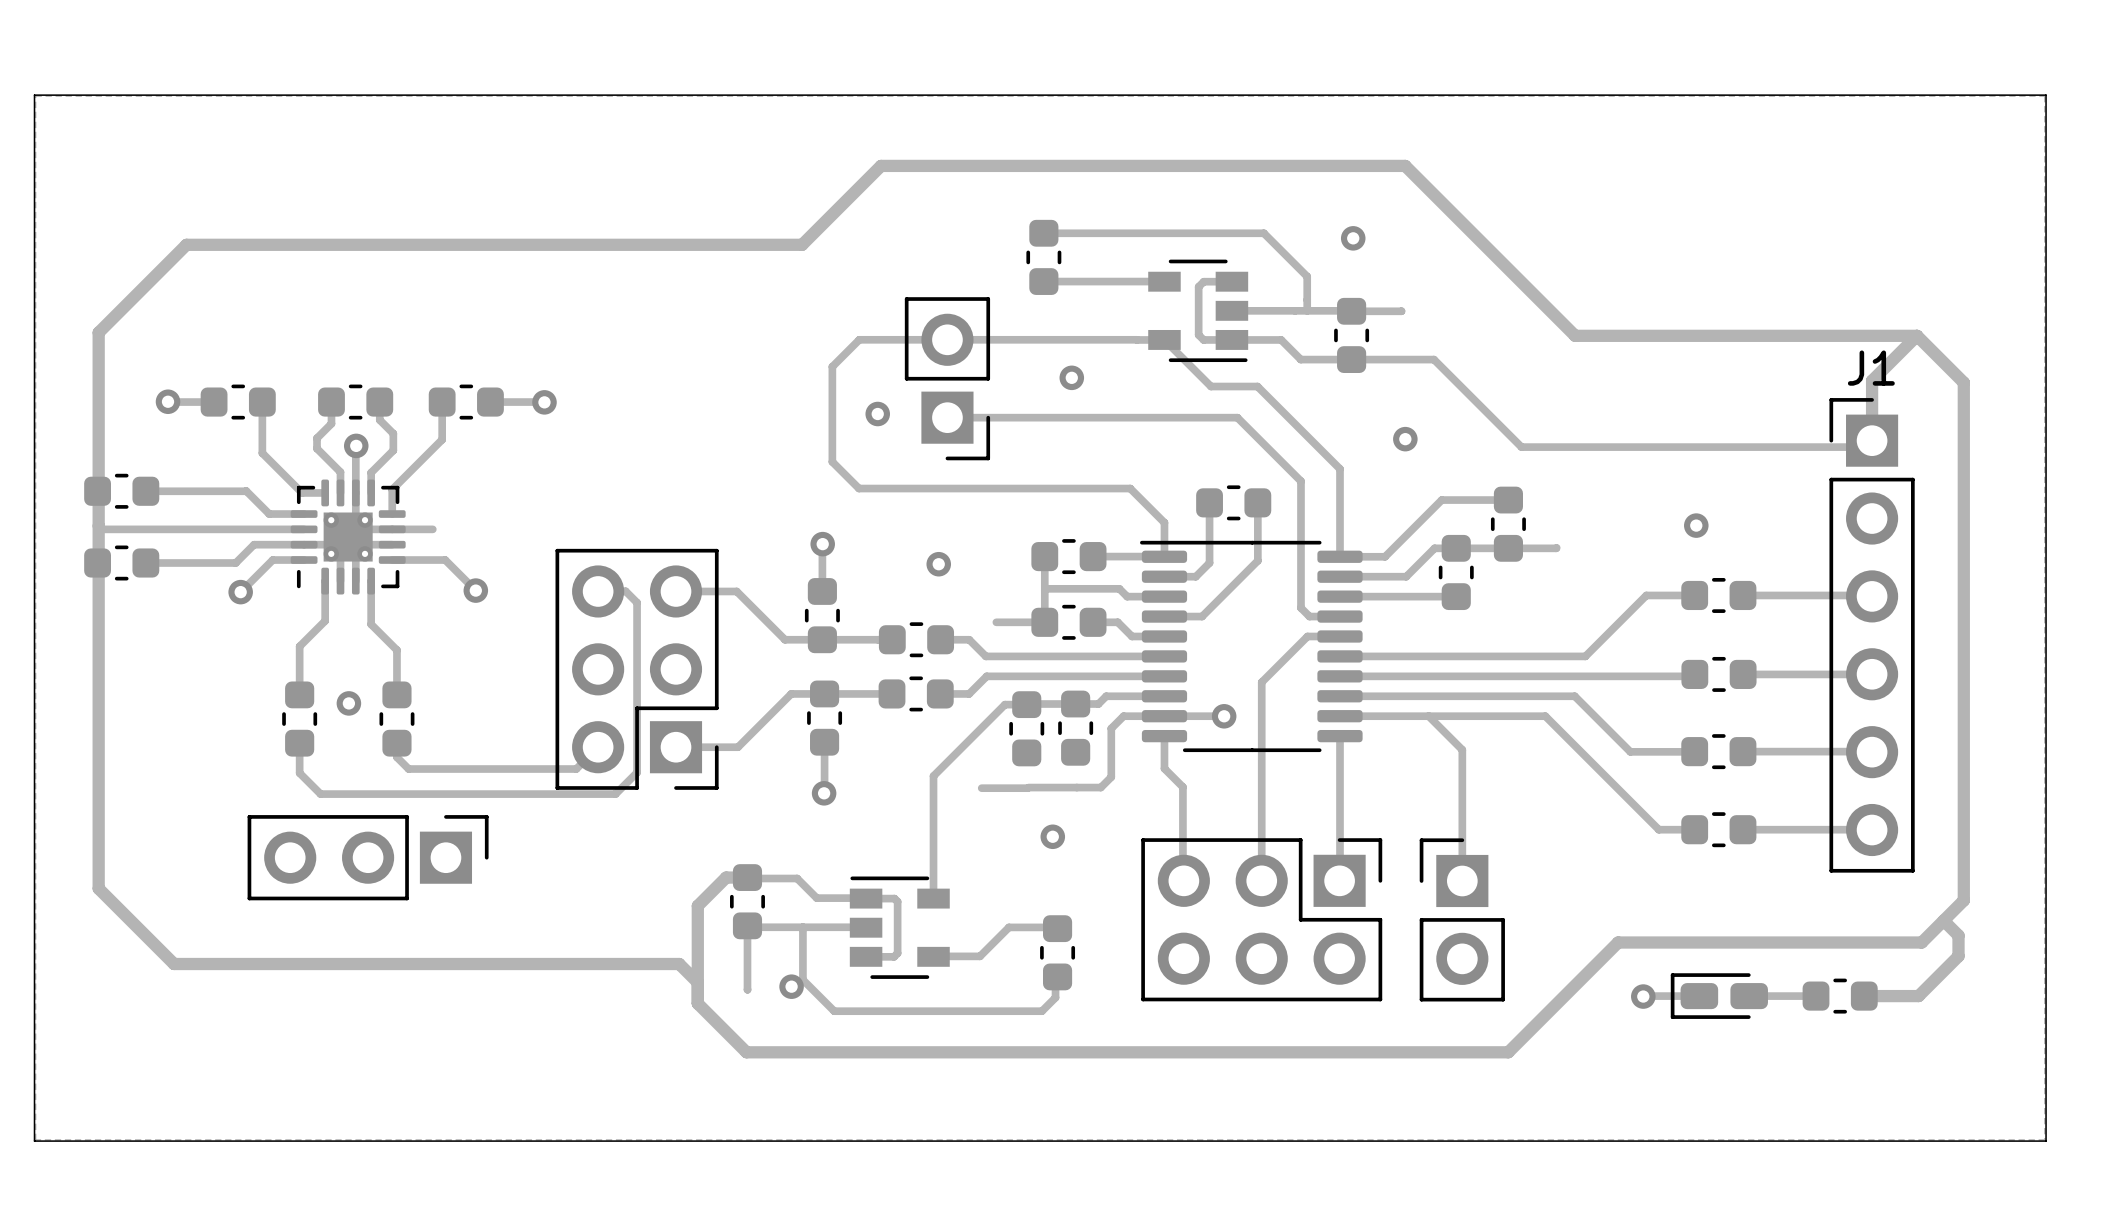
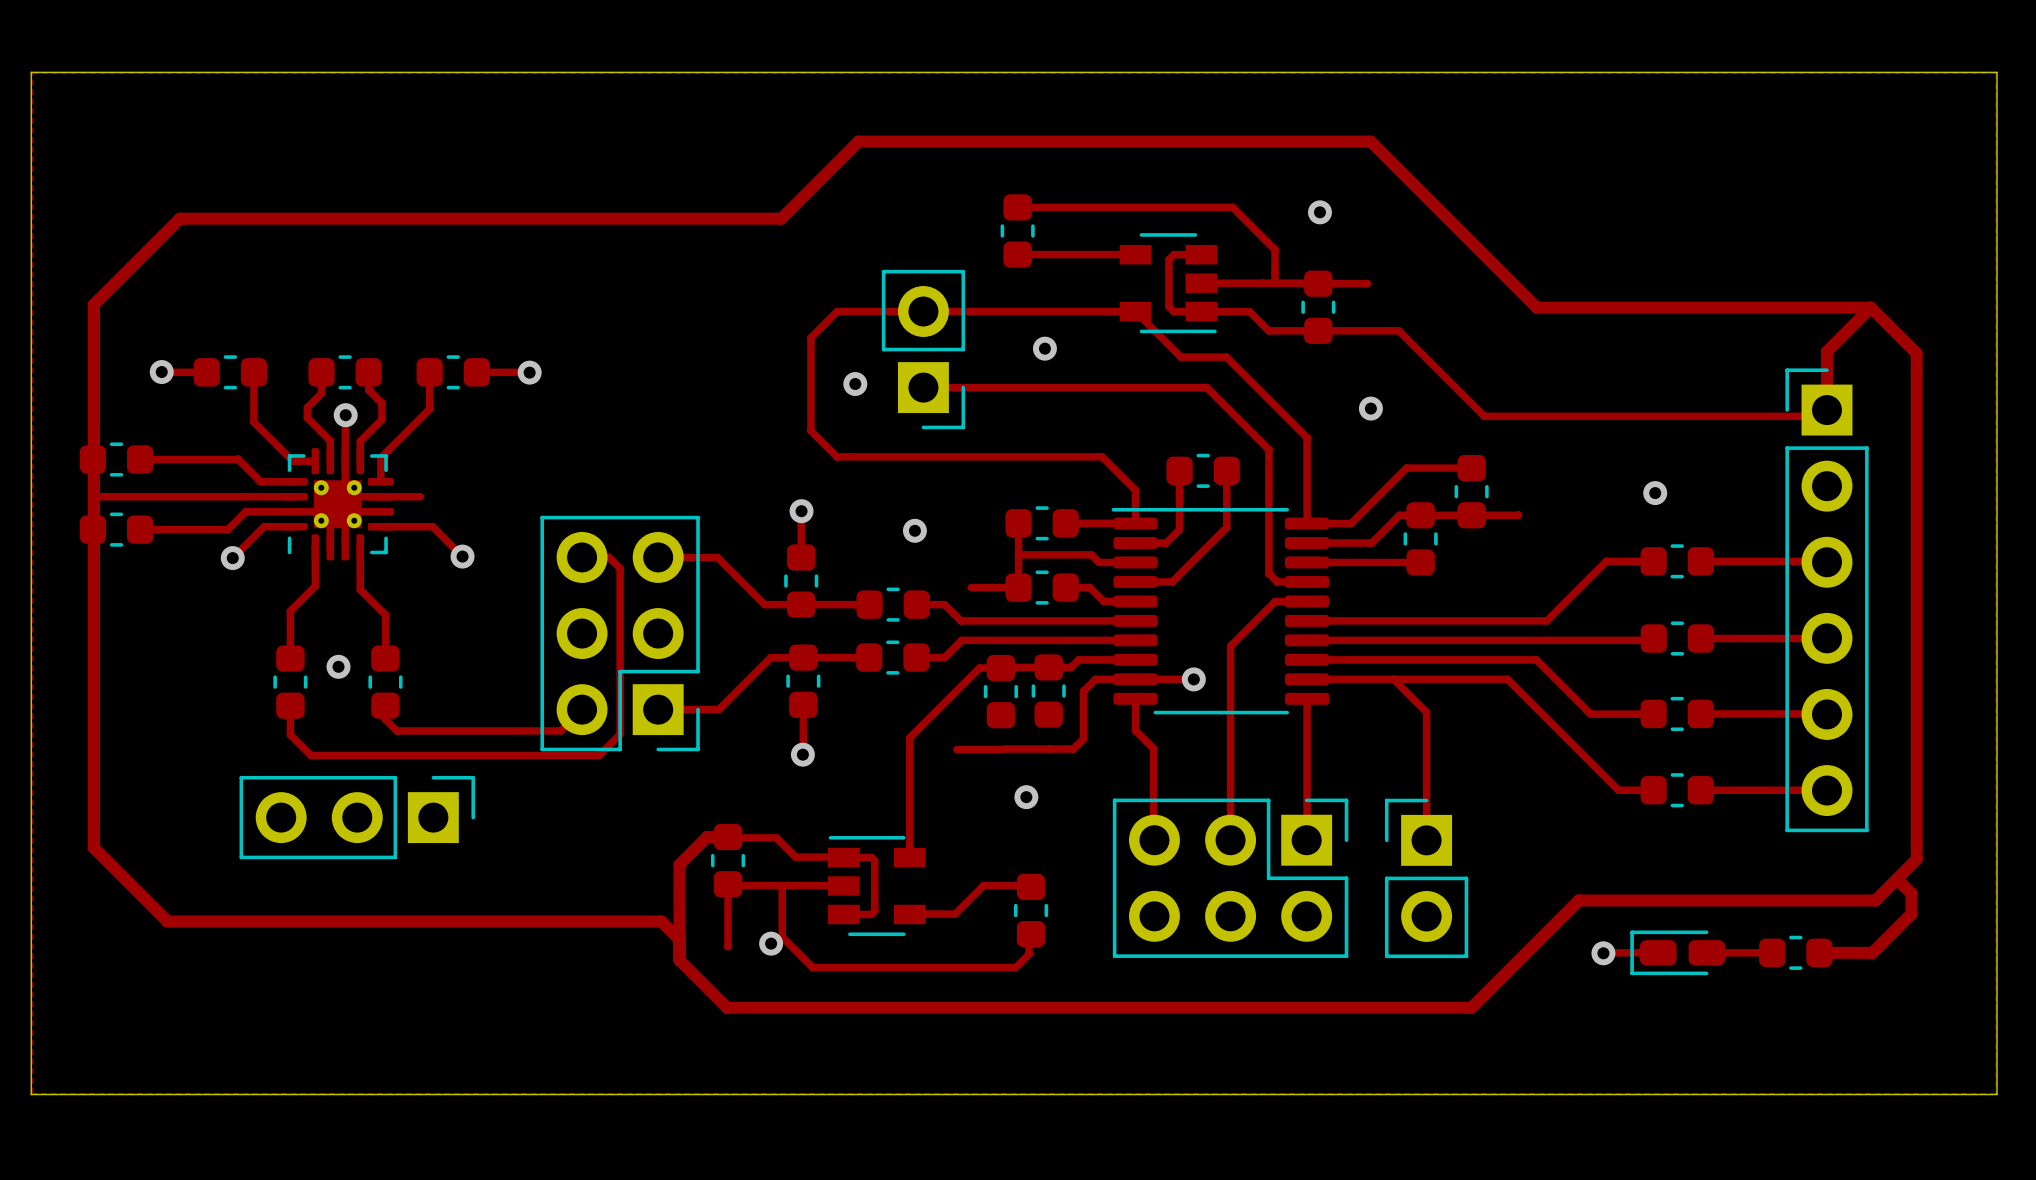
J1 name: J1 (1871, 368) -> none

